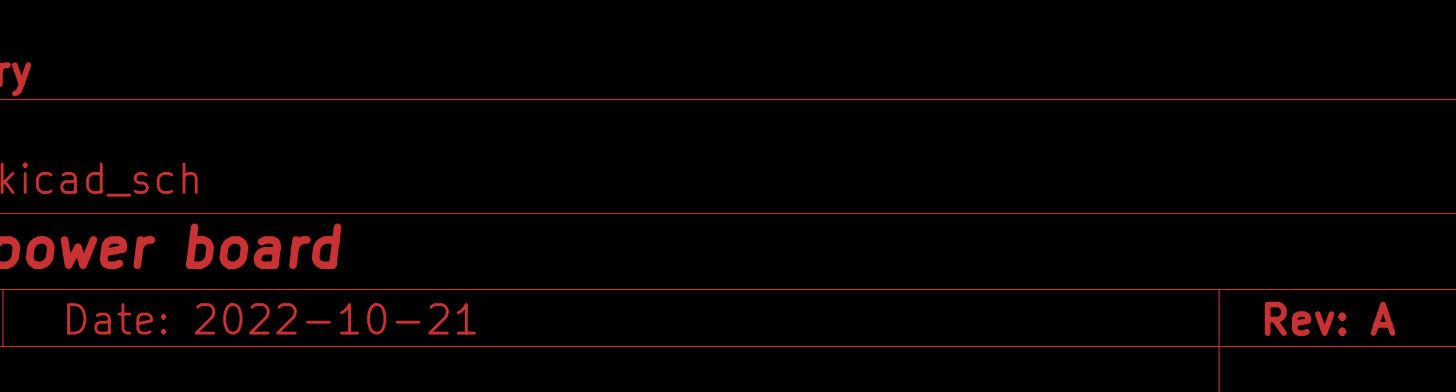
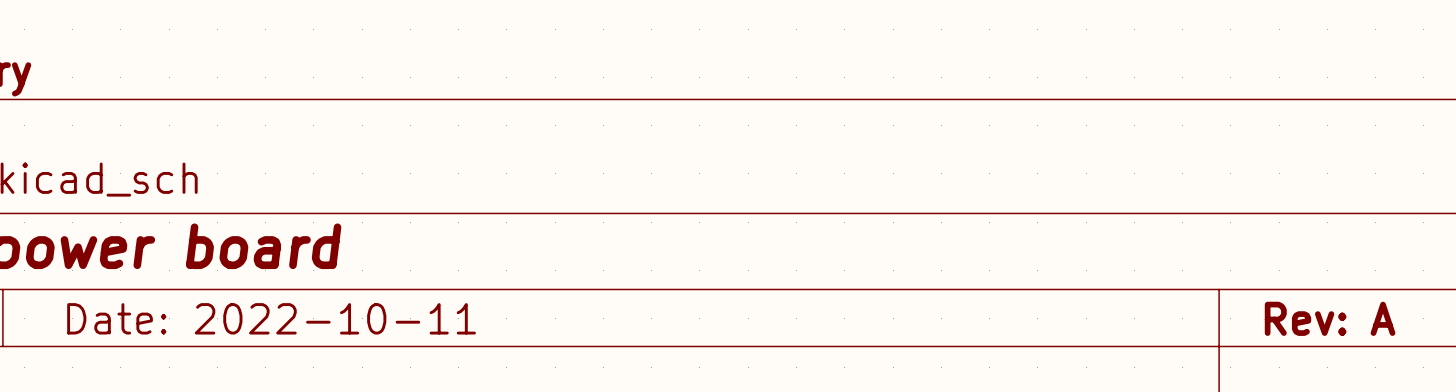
title block: Date: 2022-10-21 (271, 318) -> Date: 2022-10-11 (271, 318)

